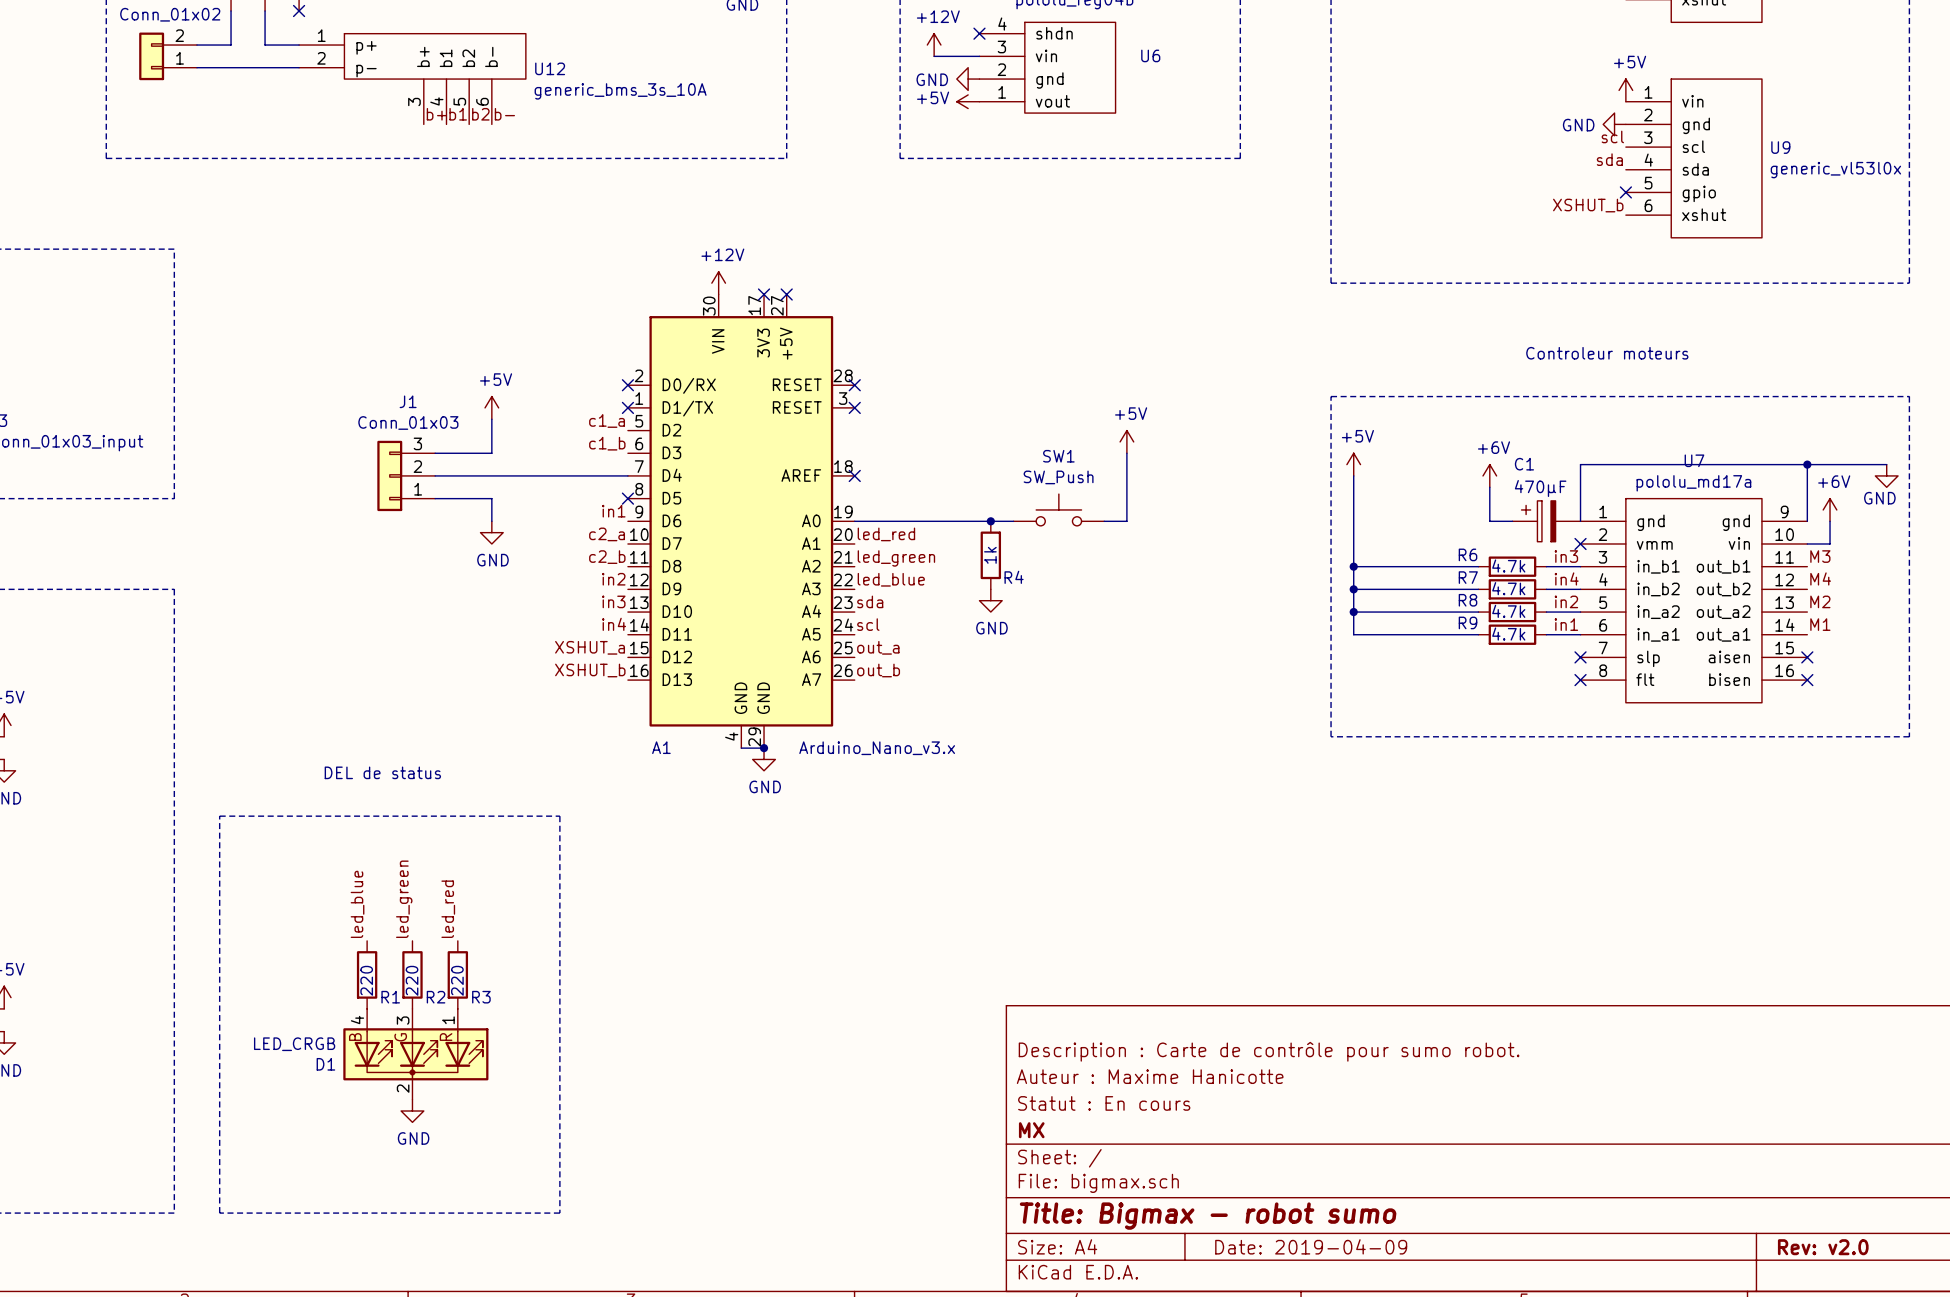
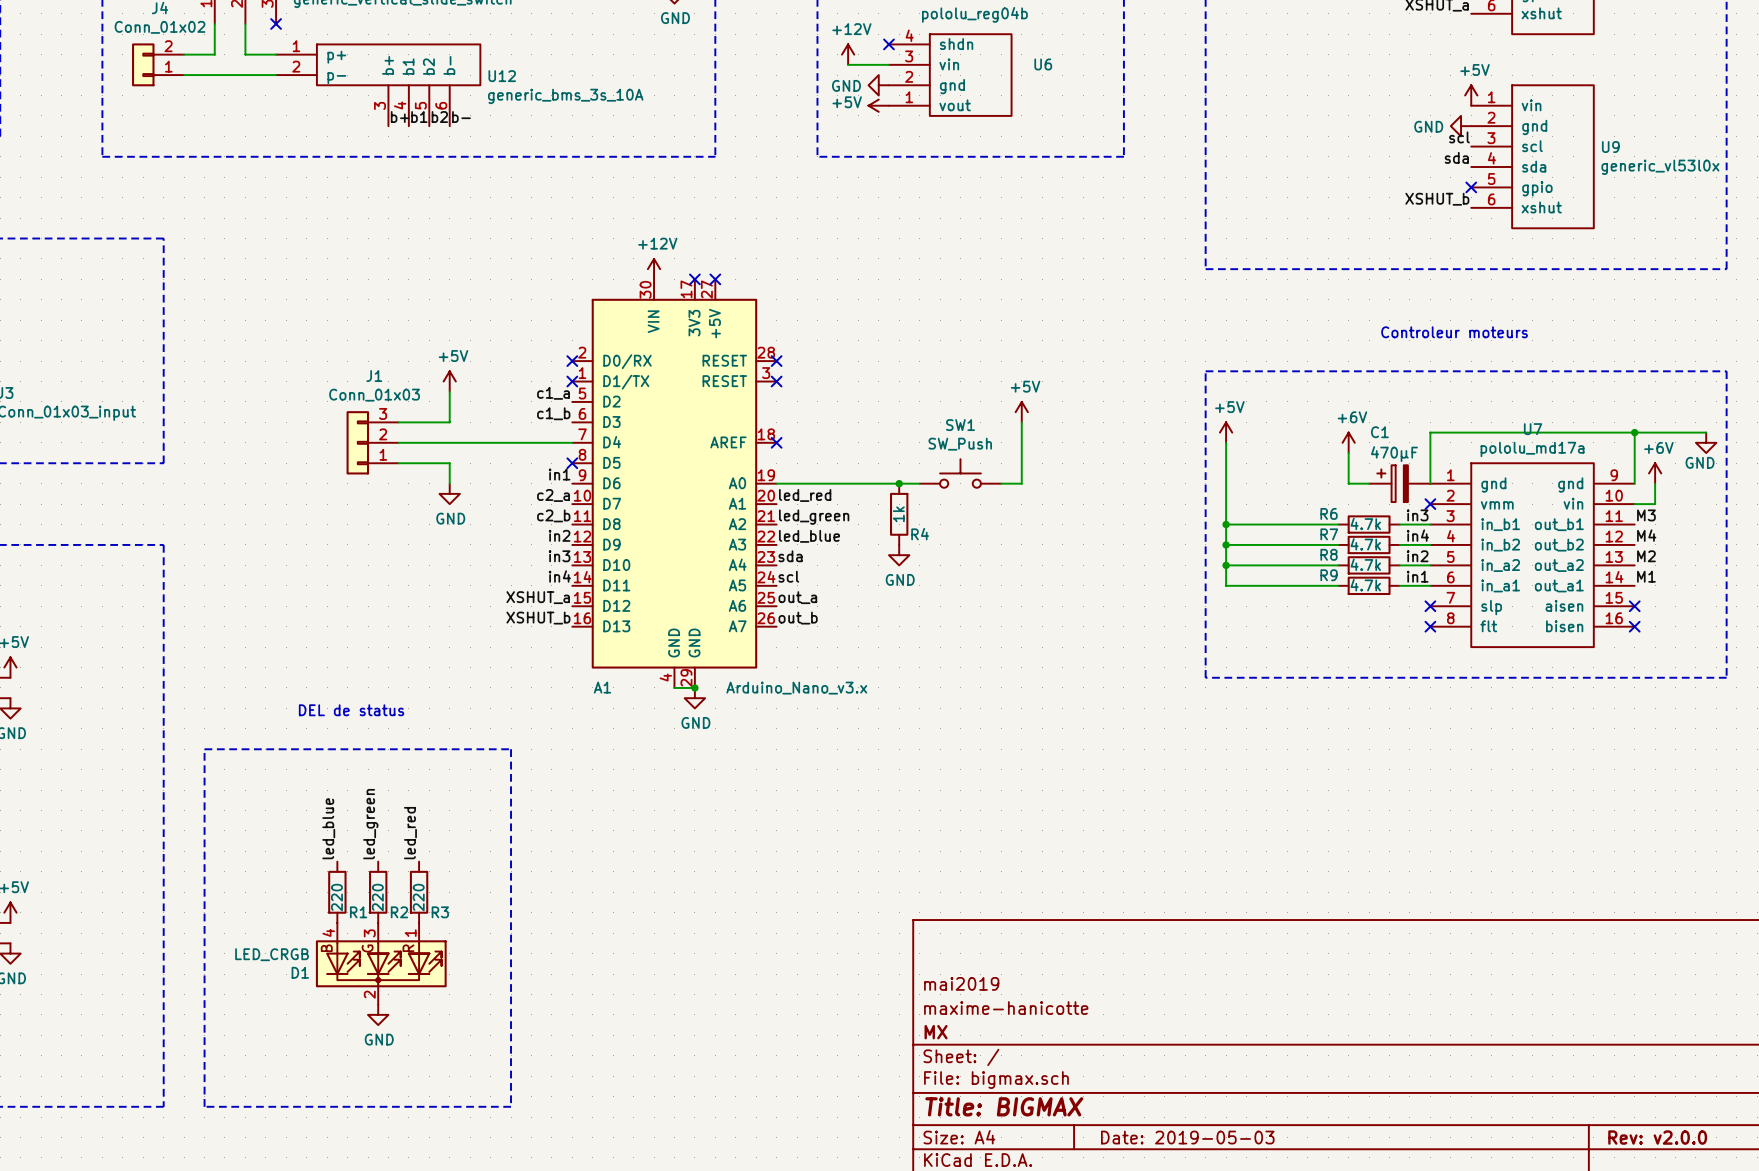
title block: Description : Carte de contrôle pour sumo robot. (1269, 1051) -> none
title block: Auteur : Maxime Hanicotte (1150, 1076) -> mai2019 (961, 983)
title block: Statut : En cours (1104, 1103) -> maxime-hanicotte (1006, 1008)
title block: Title: Bigmax - robot sumo (1208, 1216) -> Title: BIGMAX (1004, 1106)
title block: Date: 2019-04-09 (1311, 1246) -> Date: 2019-05-03 (1187, 1137)
title block: Rev: v2.0 (1823, 1247) -> Rev: v2.0.0 (1657, 1137)

